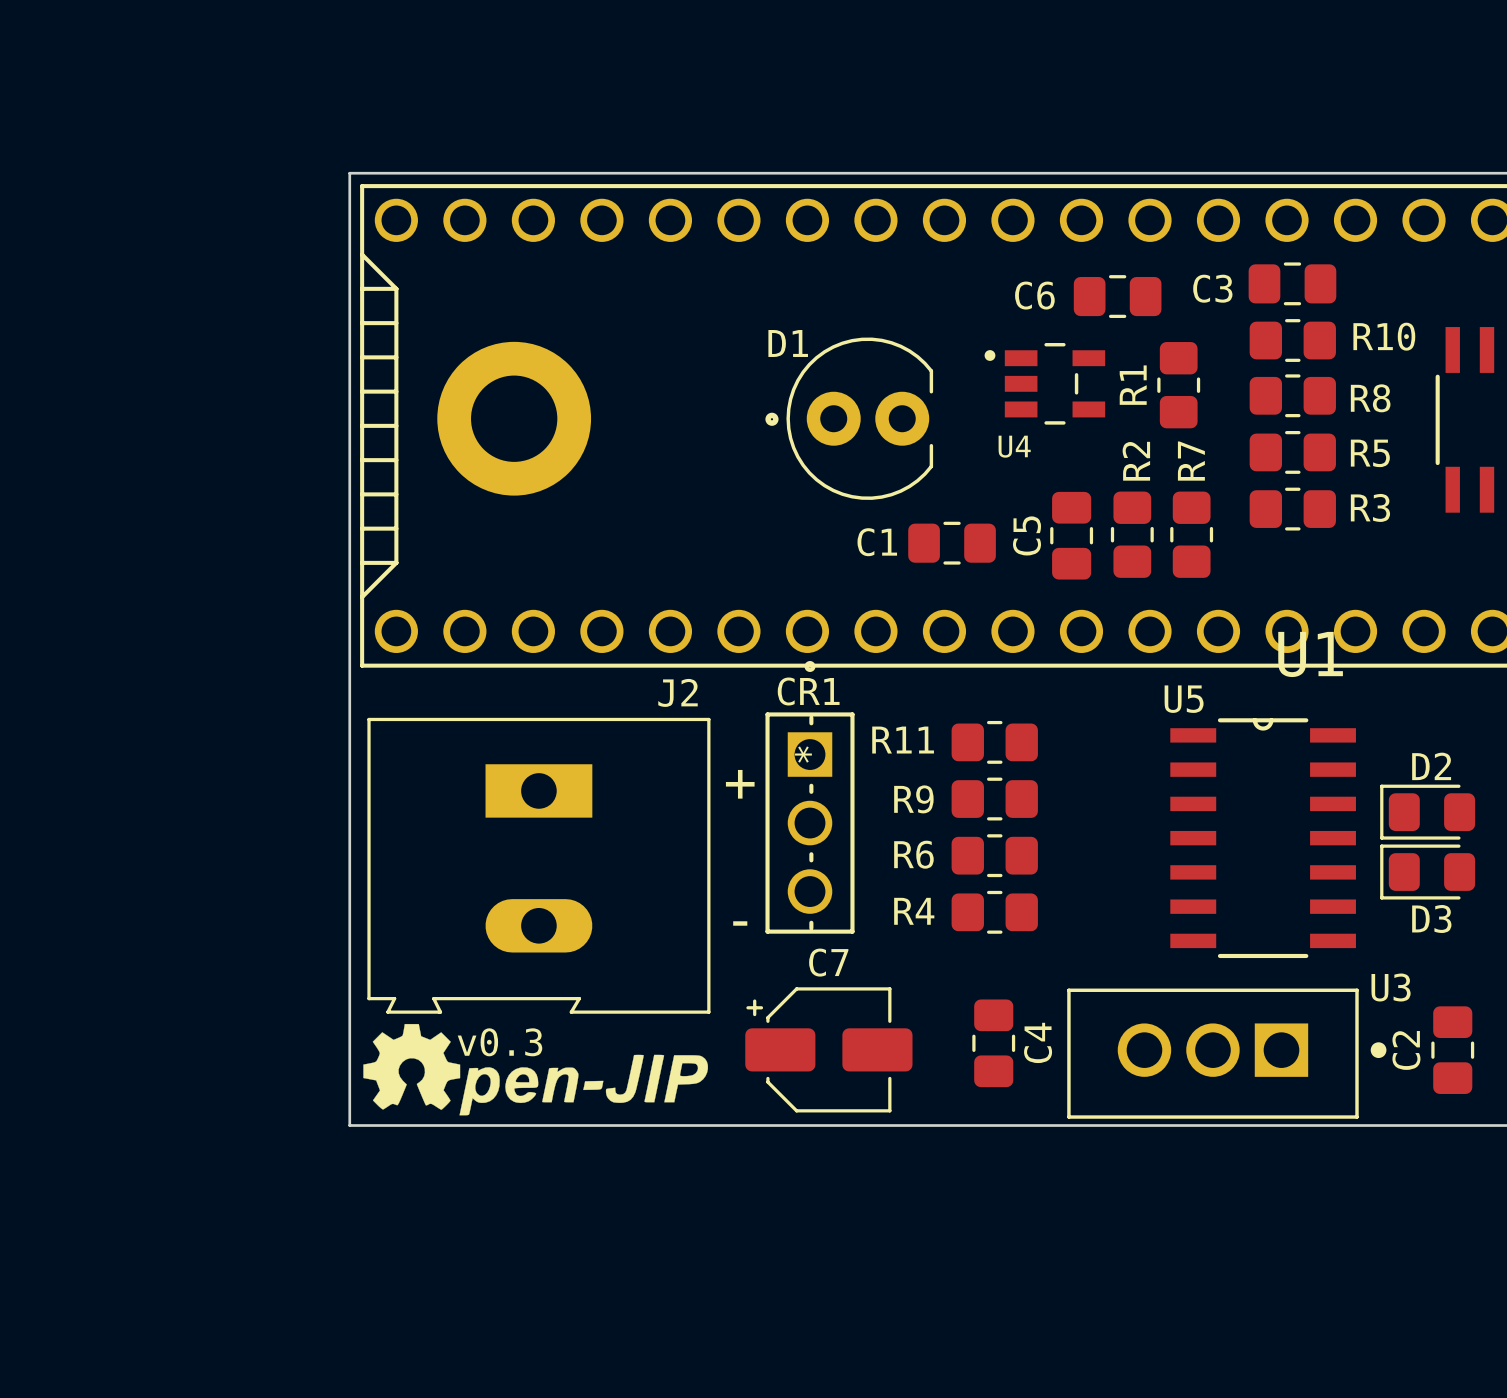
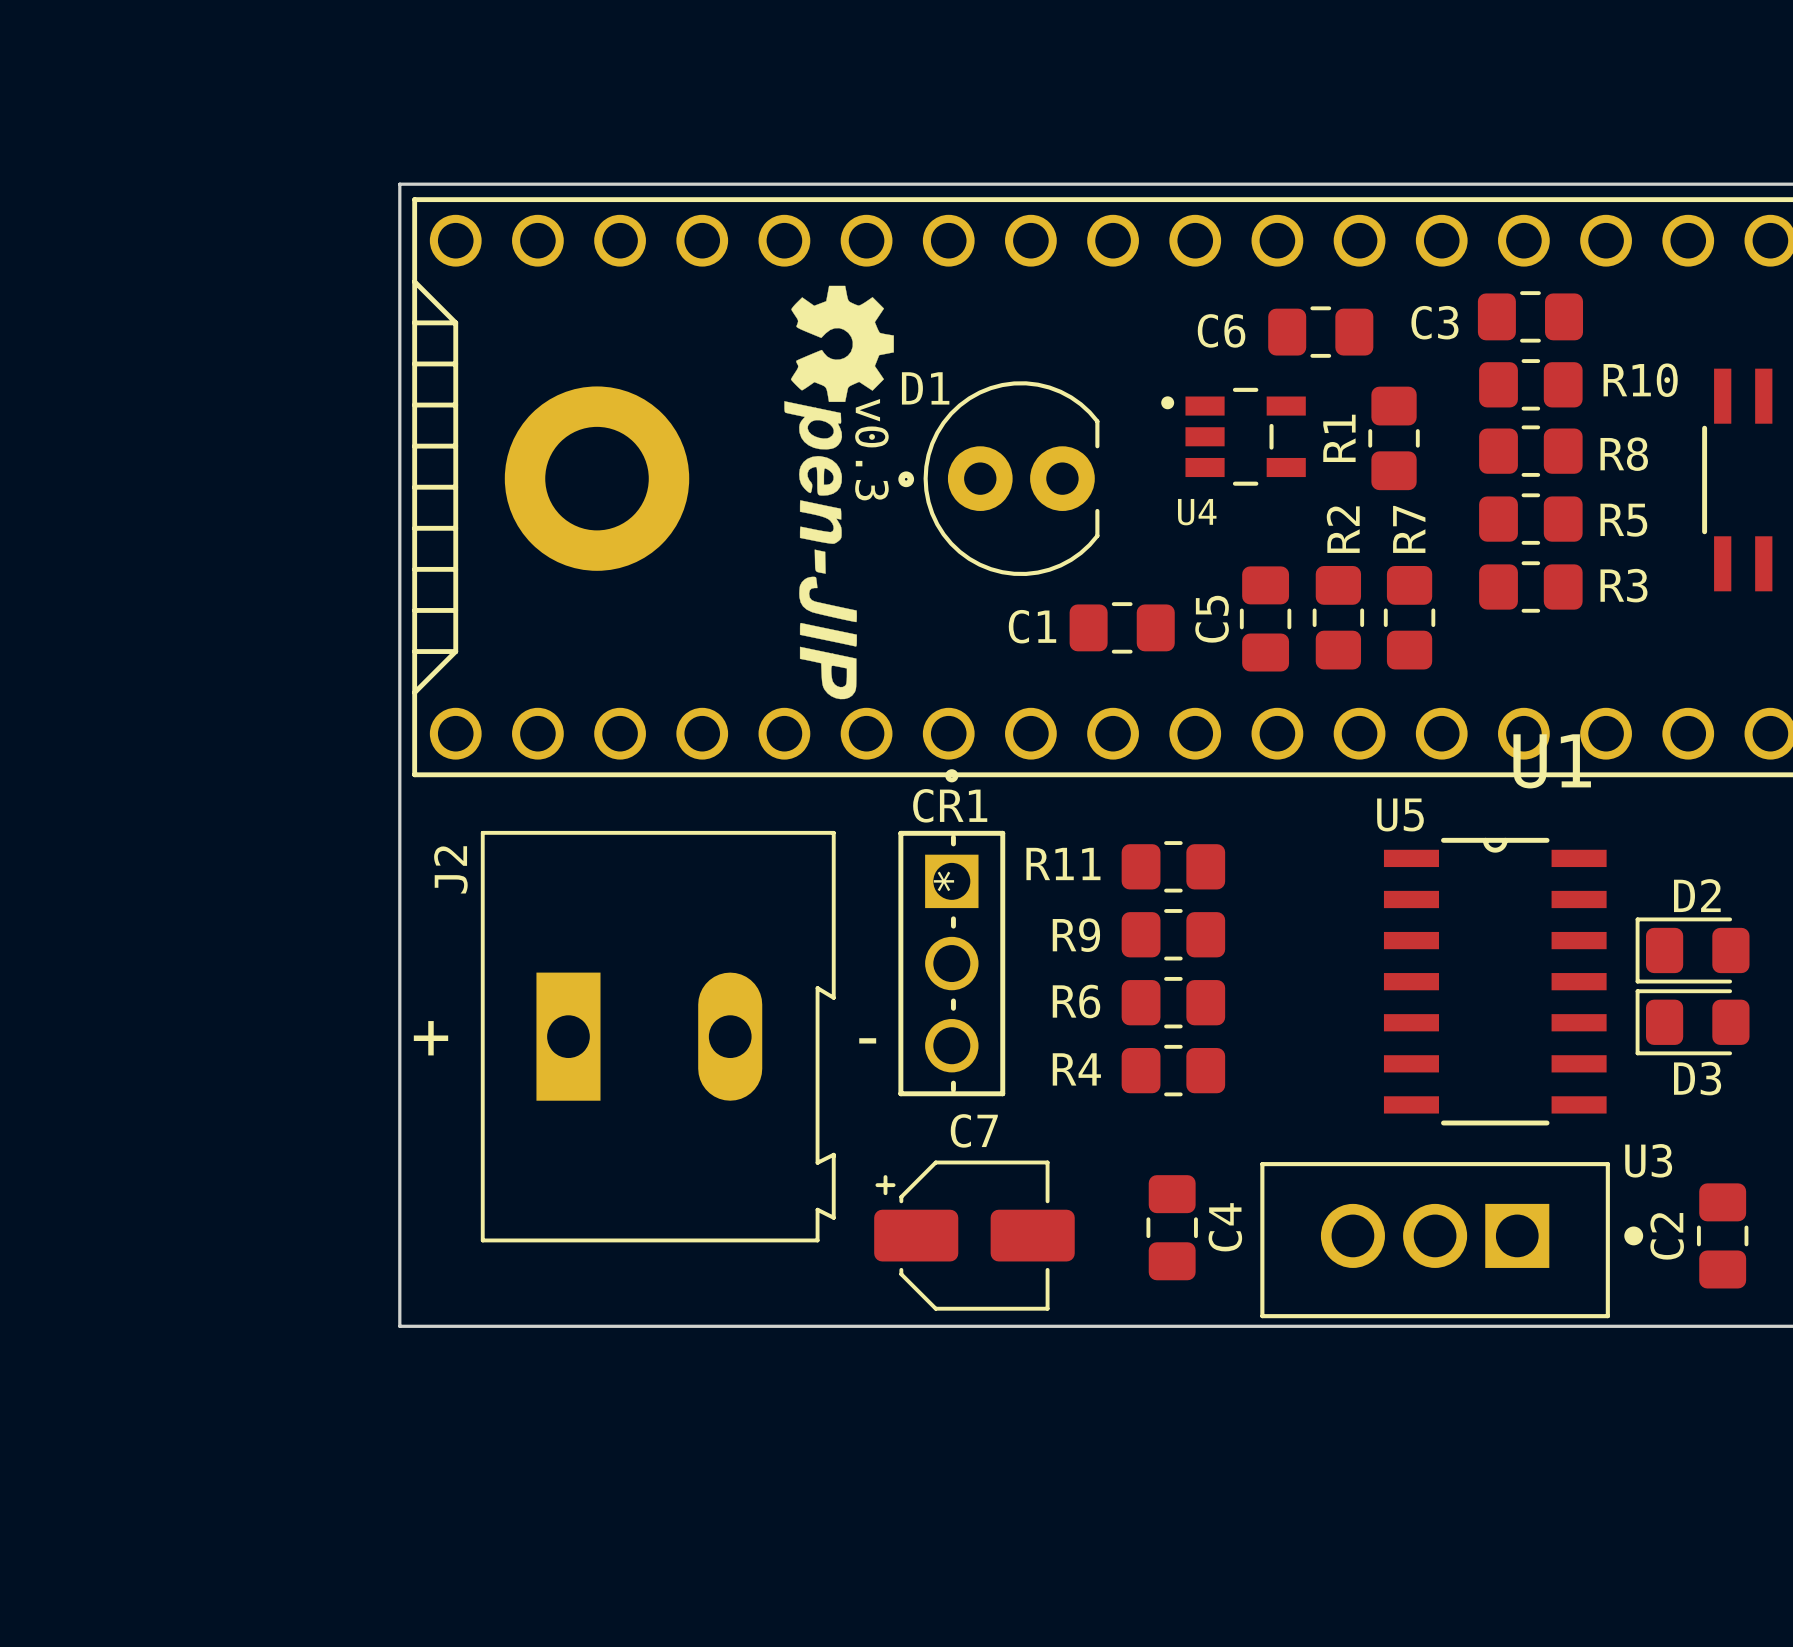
drawing: none -> [784, 285, 894, 700]
text: none -> v0.3 (871, 449)
text position: + (740, 784) -> + (430, 1038)
J2 rotation: 0° (538, 865) -> 90° counterclockwise (658, 1036)
text position: - (740, 923) -> - (867, 1040)
drawing: [363, 1023, 709, 1116] -> none
text: v0.3 (499, 1042) -> none

